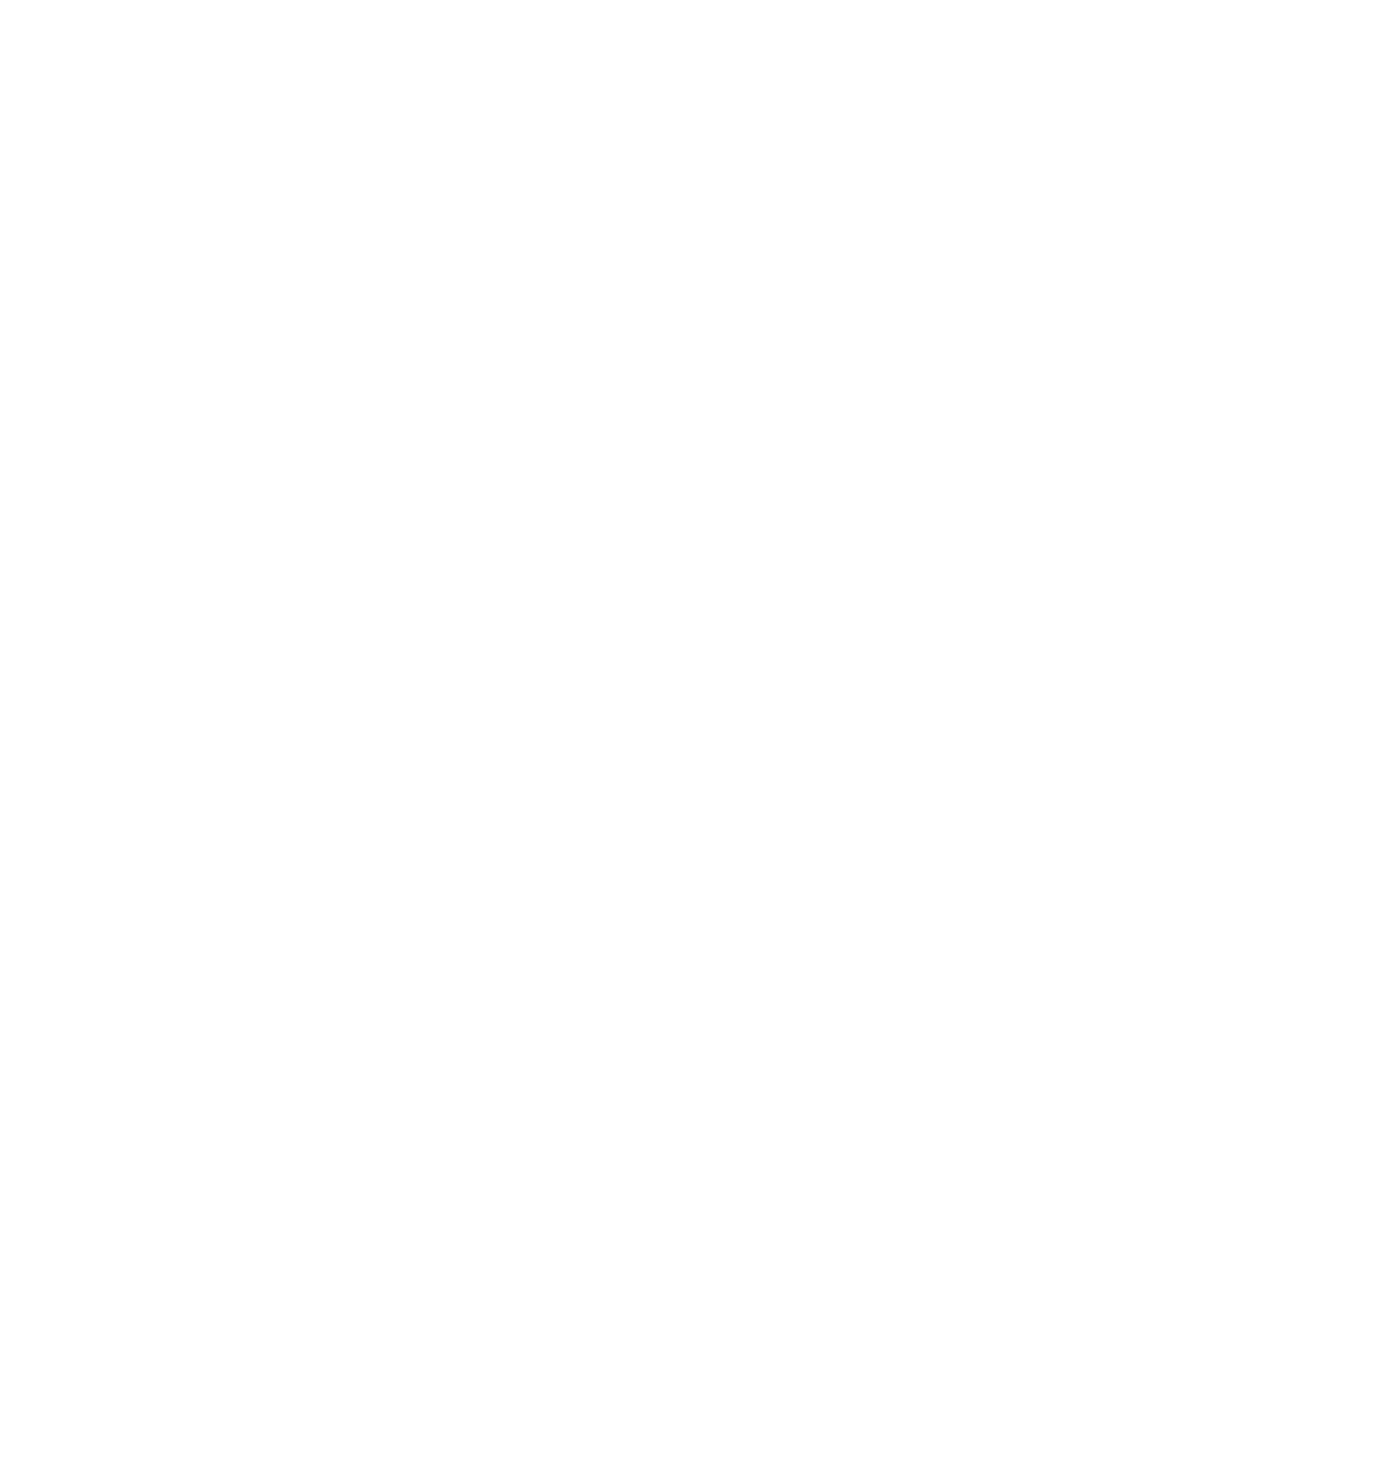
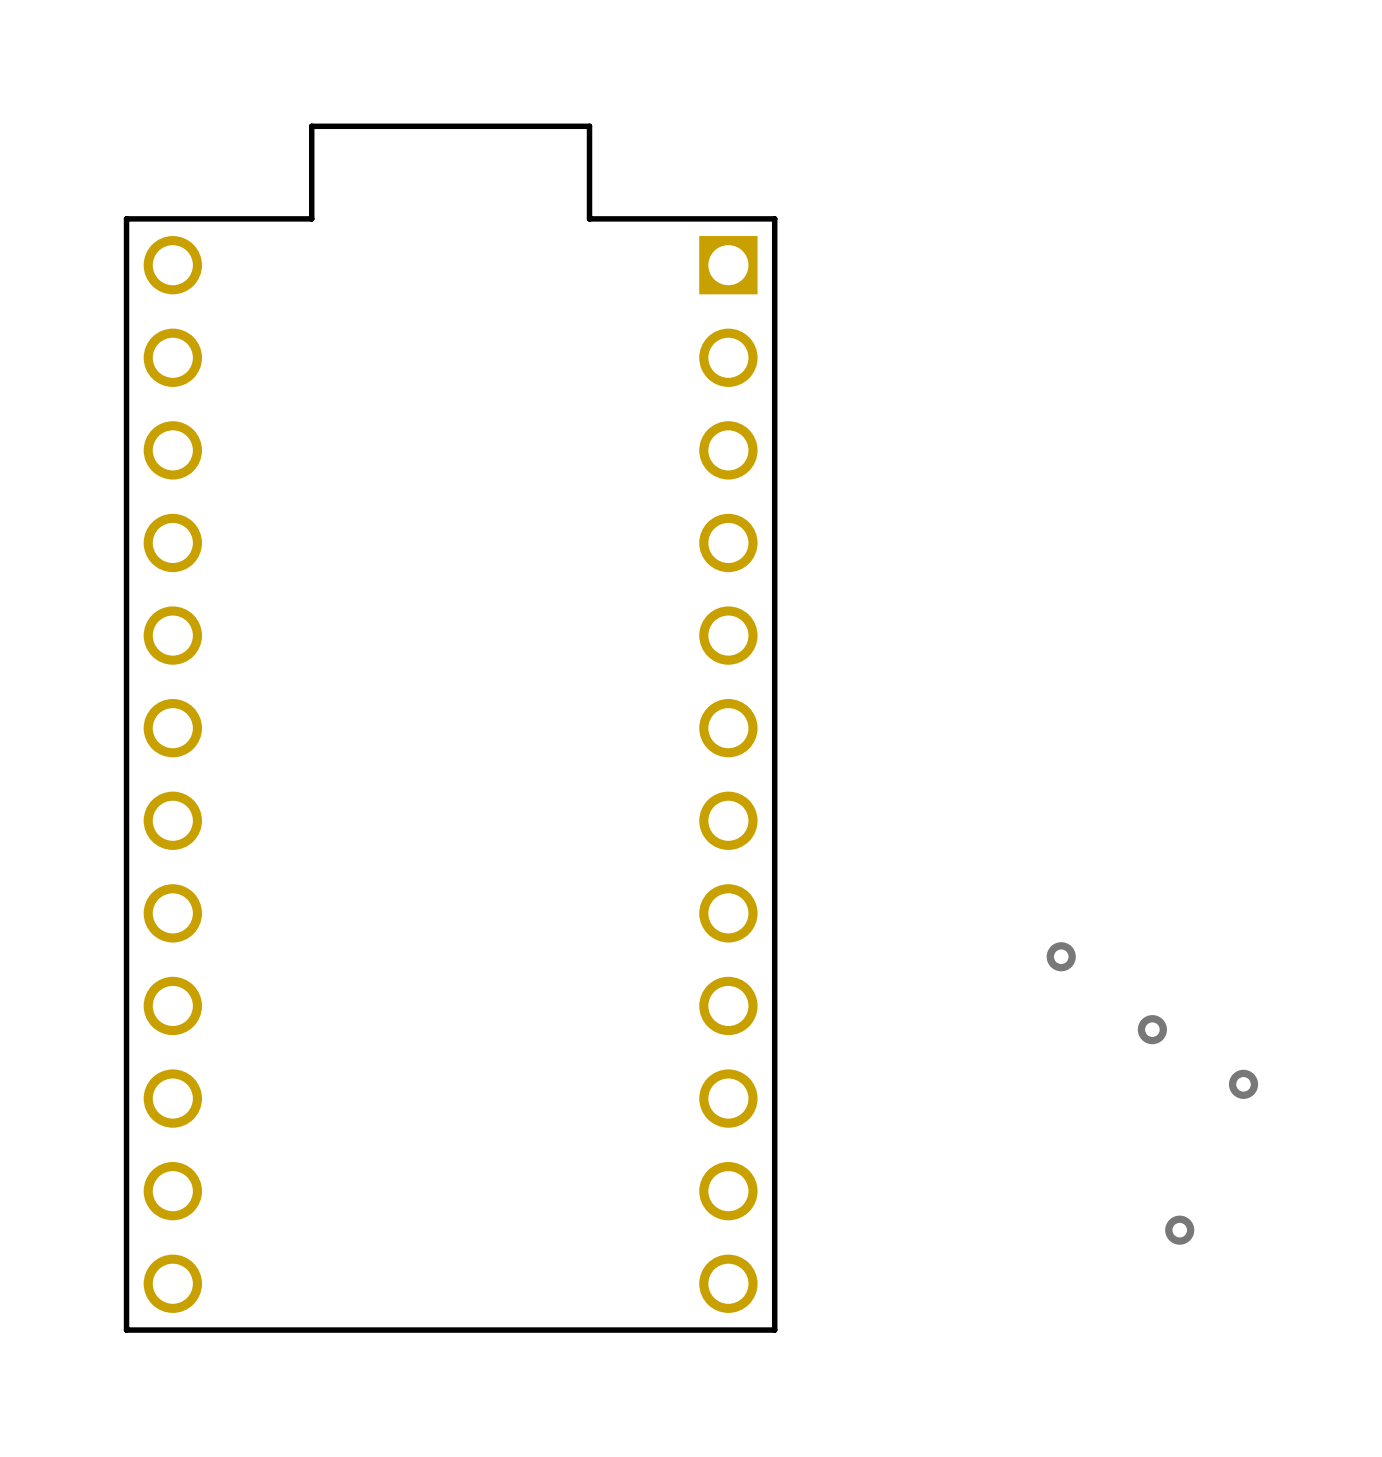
part: none -> (450, 728)
via: none -> (1061, 956)
via: none -> (1152, 1029)
via: none -> (1243, 1084)
via: none -> (1179, 1230)

